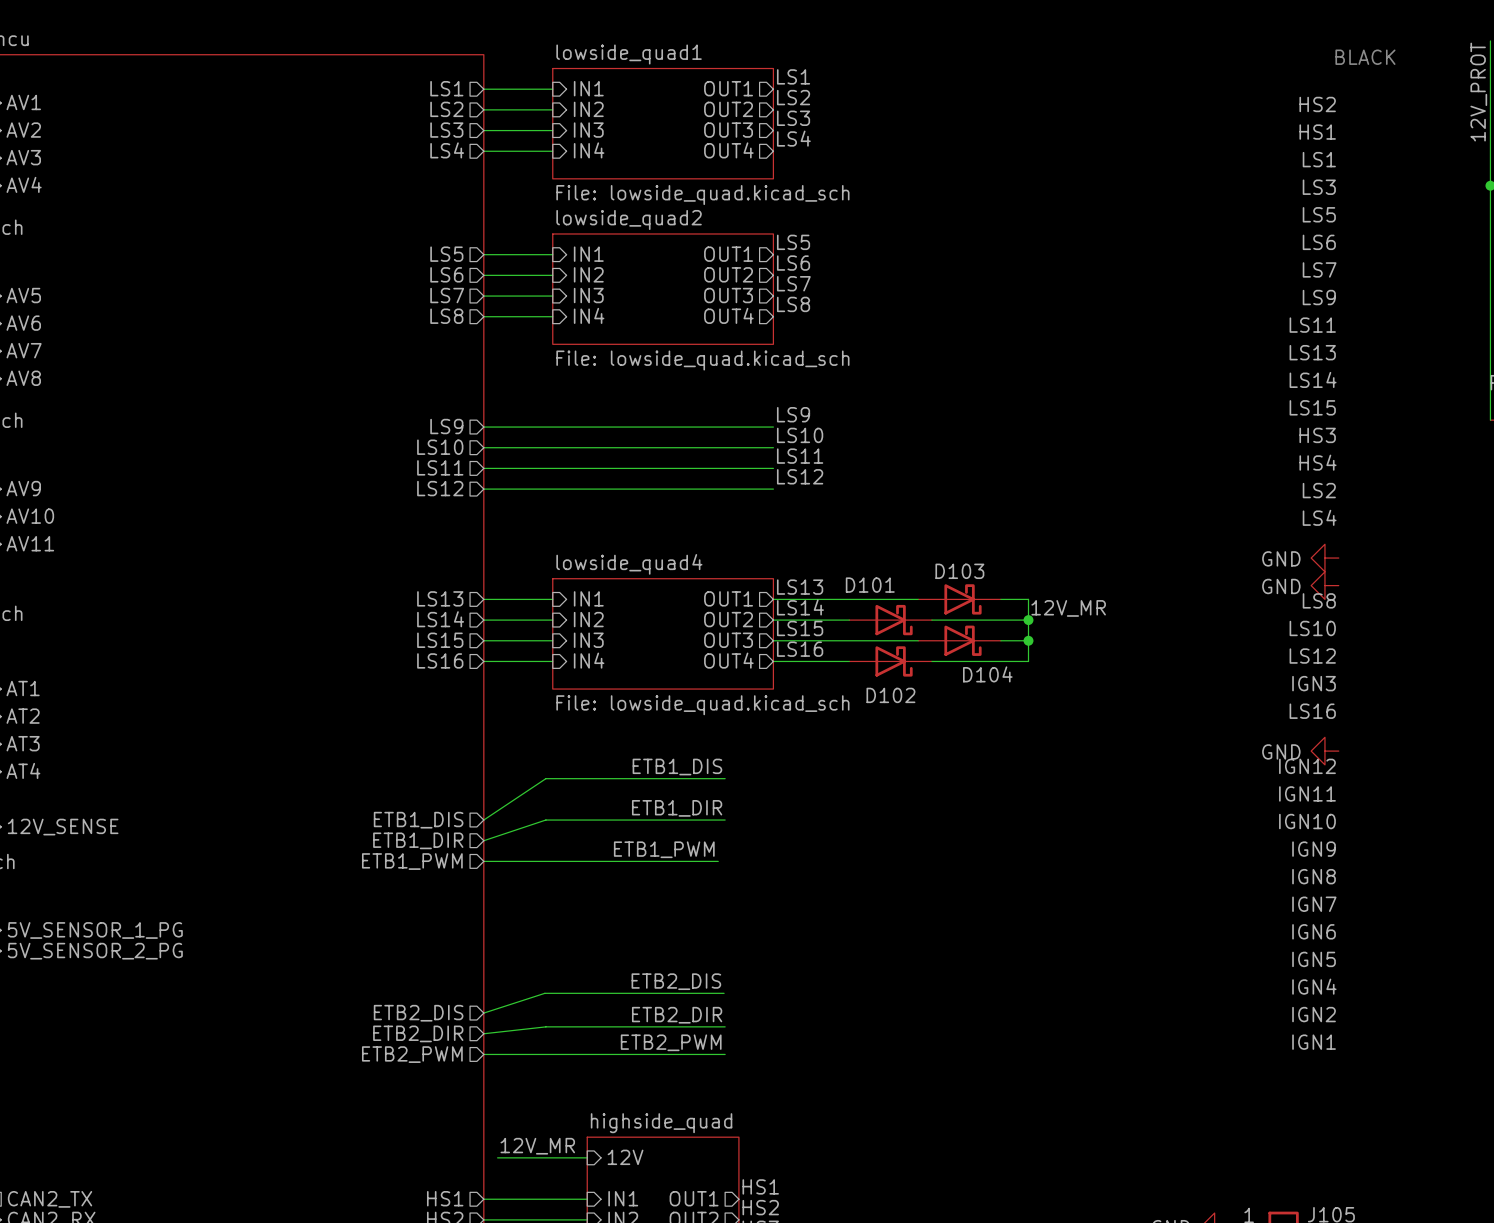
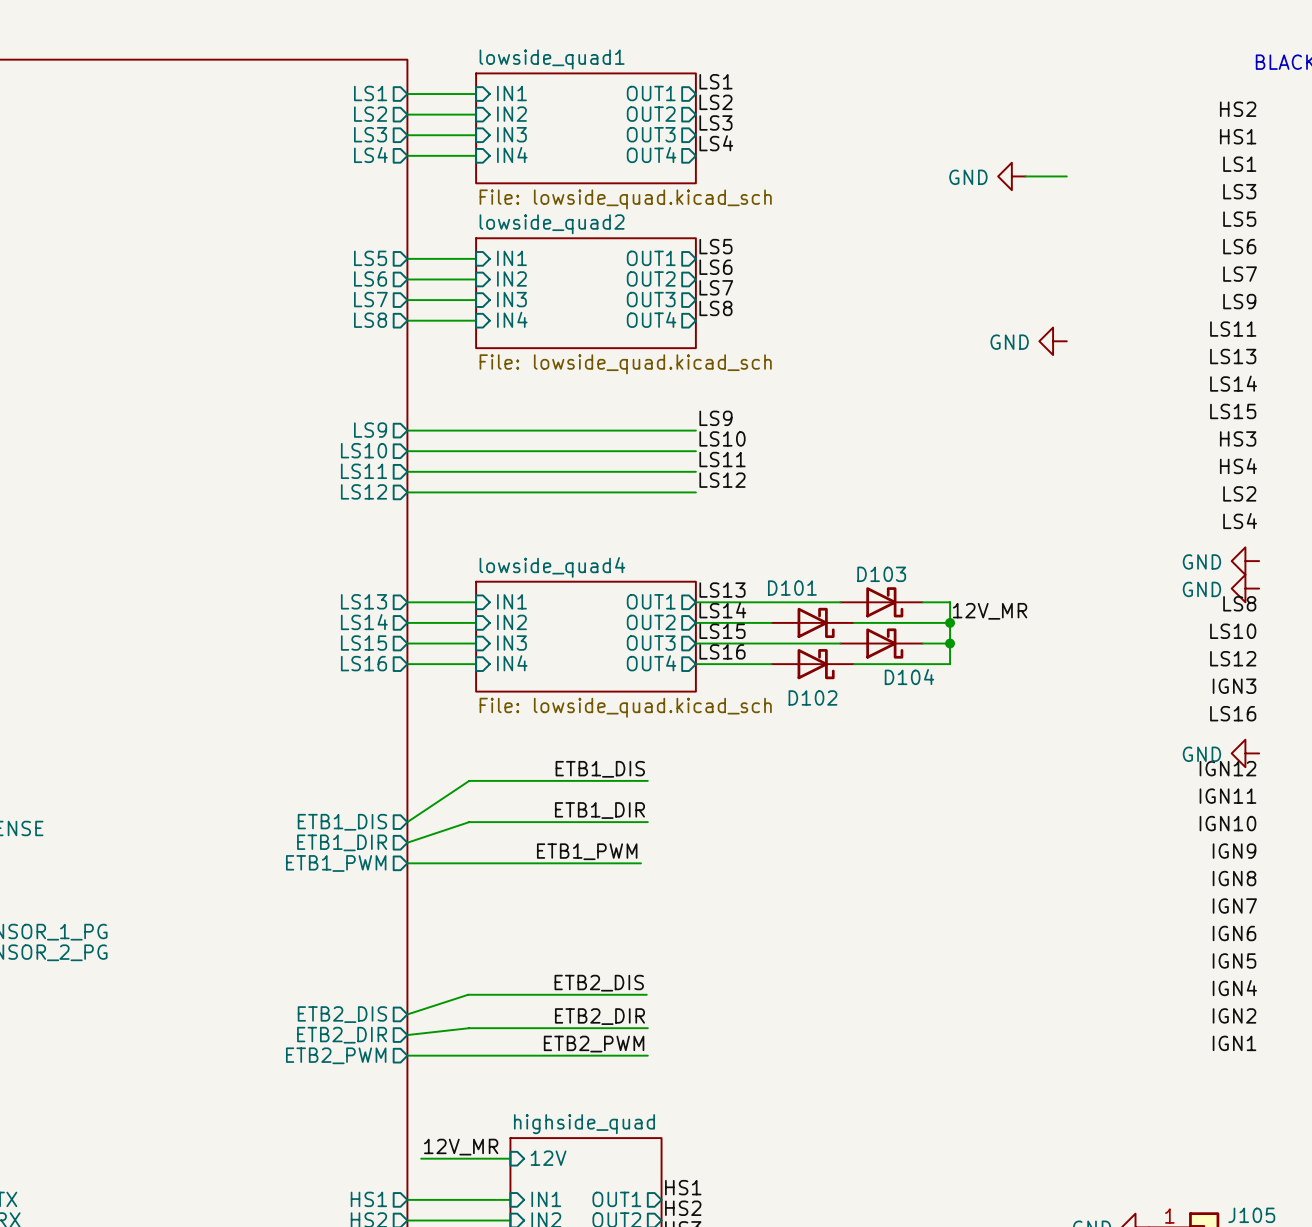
power symbol: none -> GND (1011, 176)
wire: none -> (1025, 176) (1066, 176)
power symbol: none -> GND (1053, 341)

